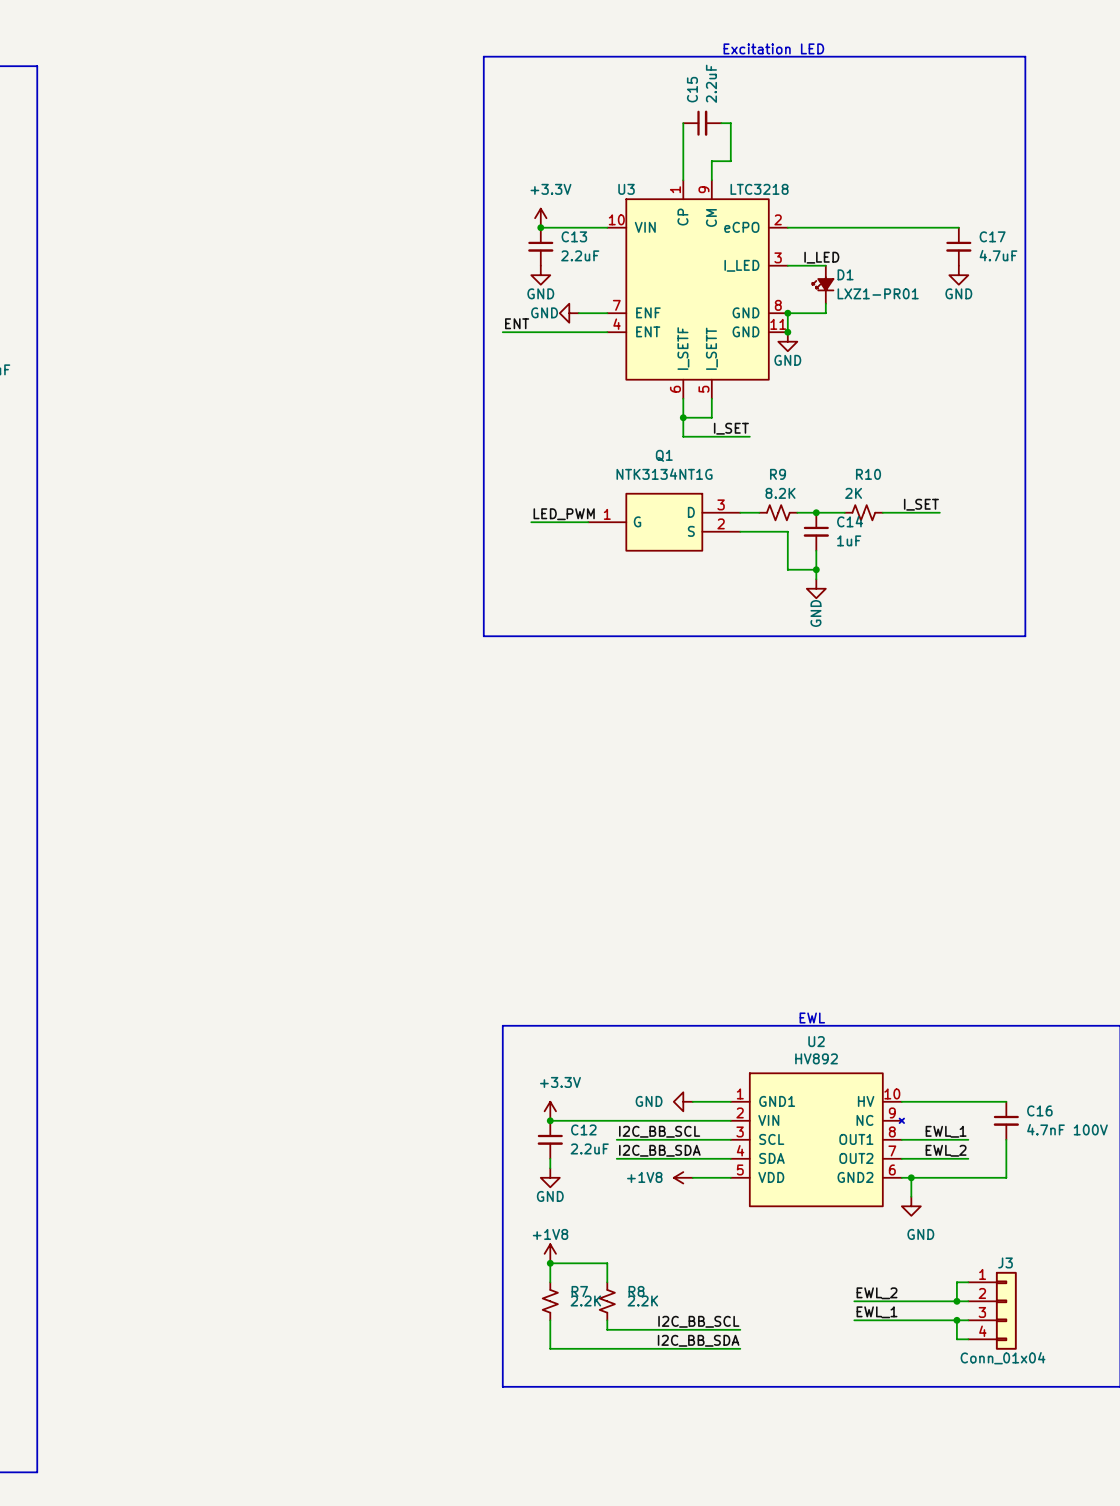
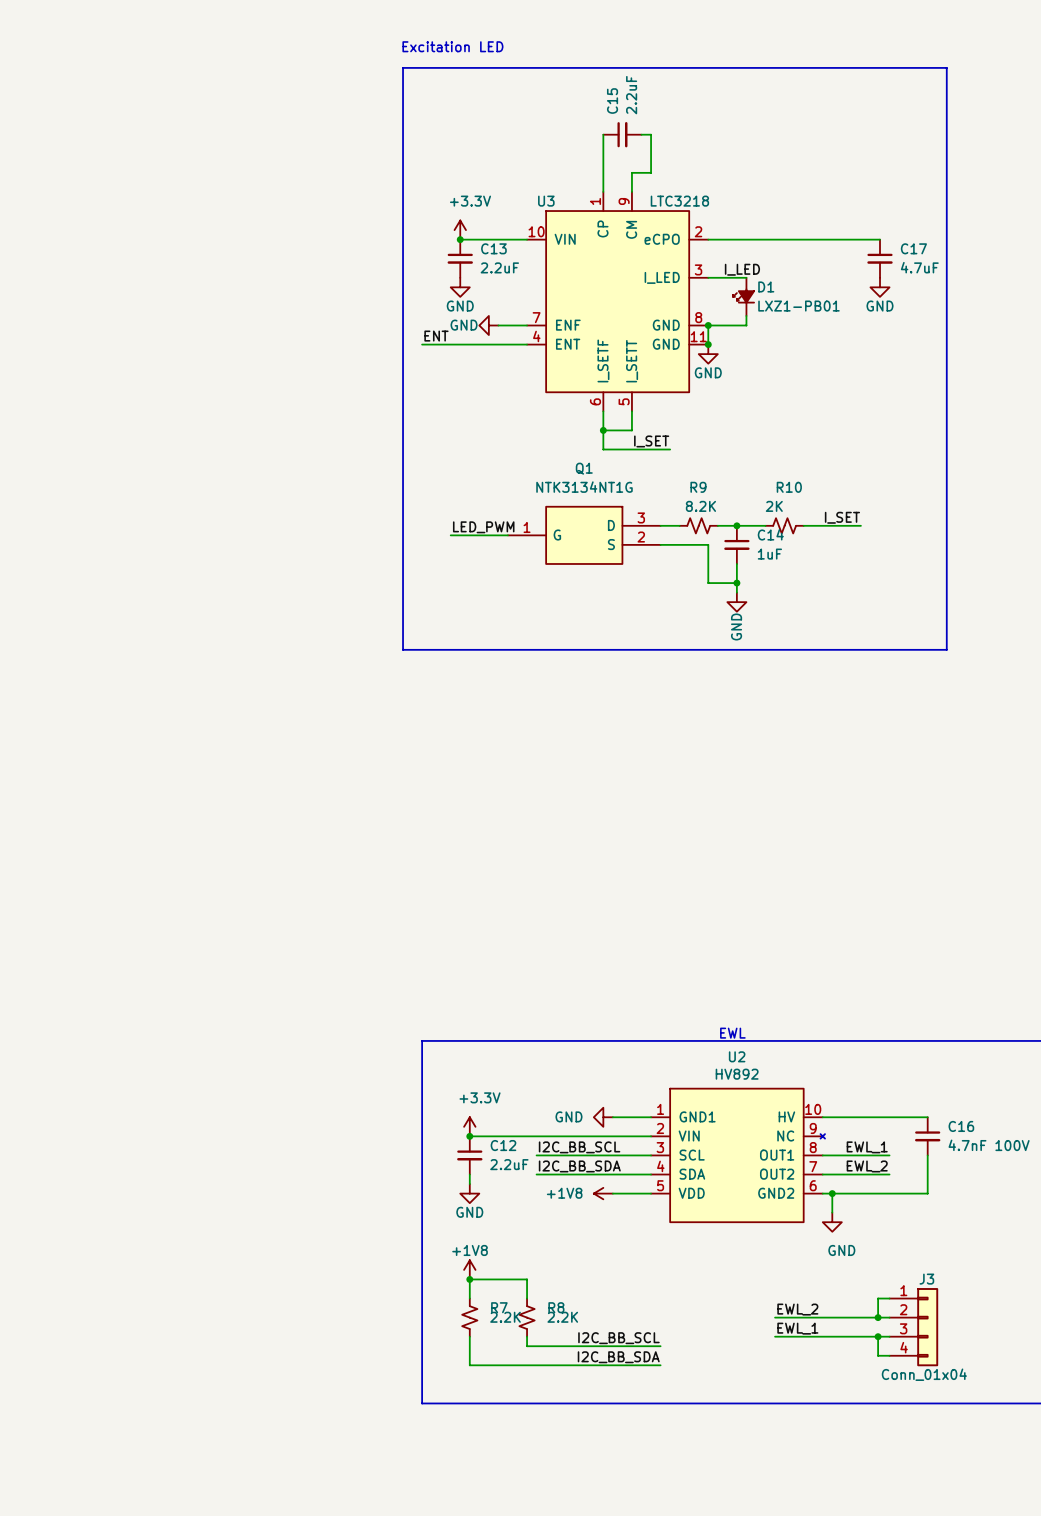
text: none -> Excitation LED (452, 46)
text: Excitation LED (773, 48) -> none
D1 value: LXZ1-PR01 (878, 293) -> LXZ1-PB01 (798, 306)

